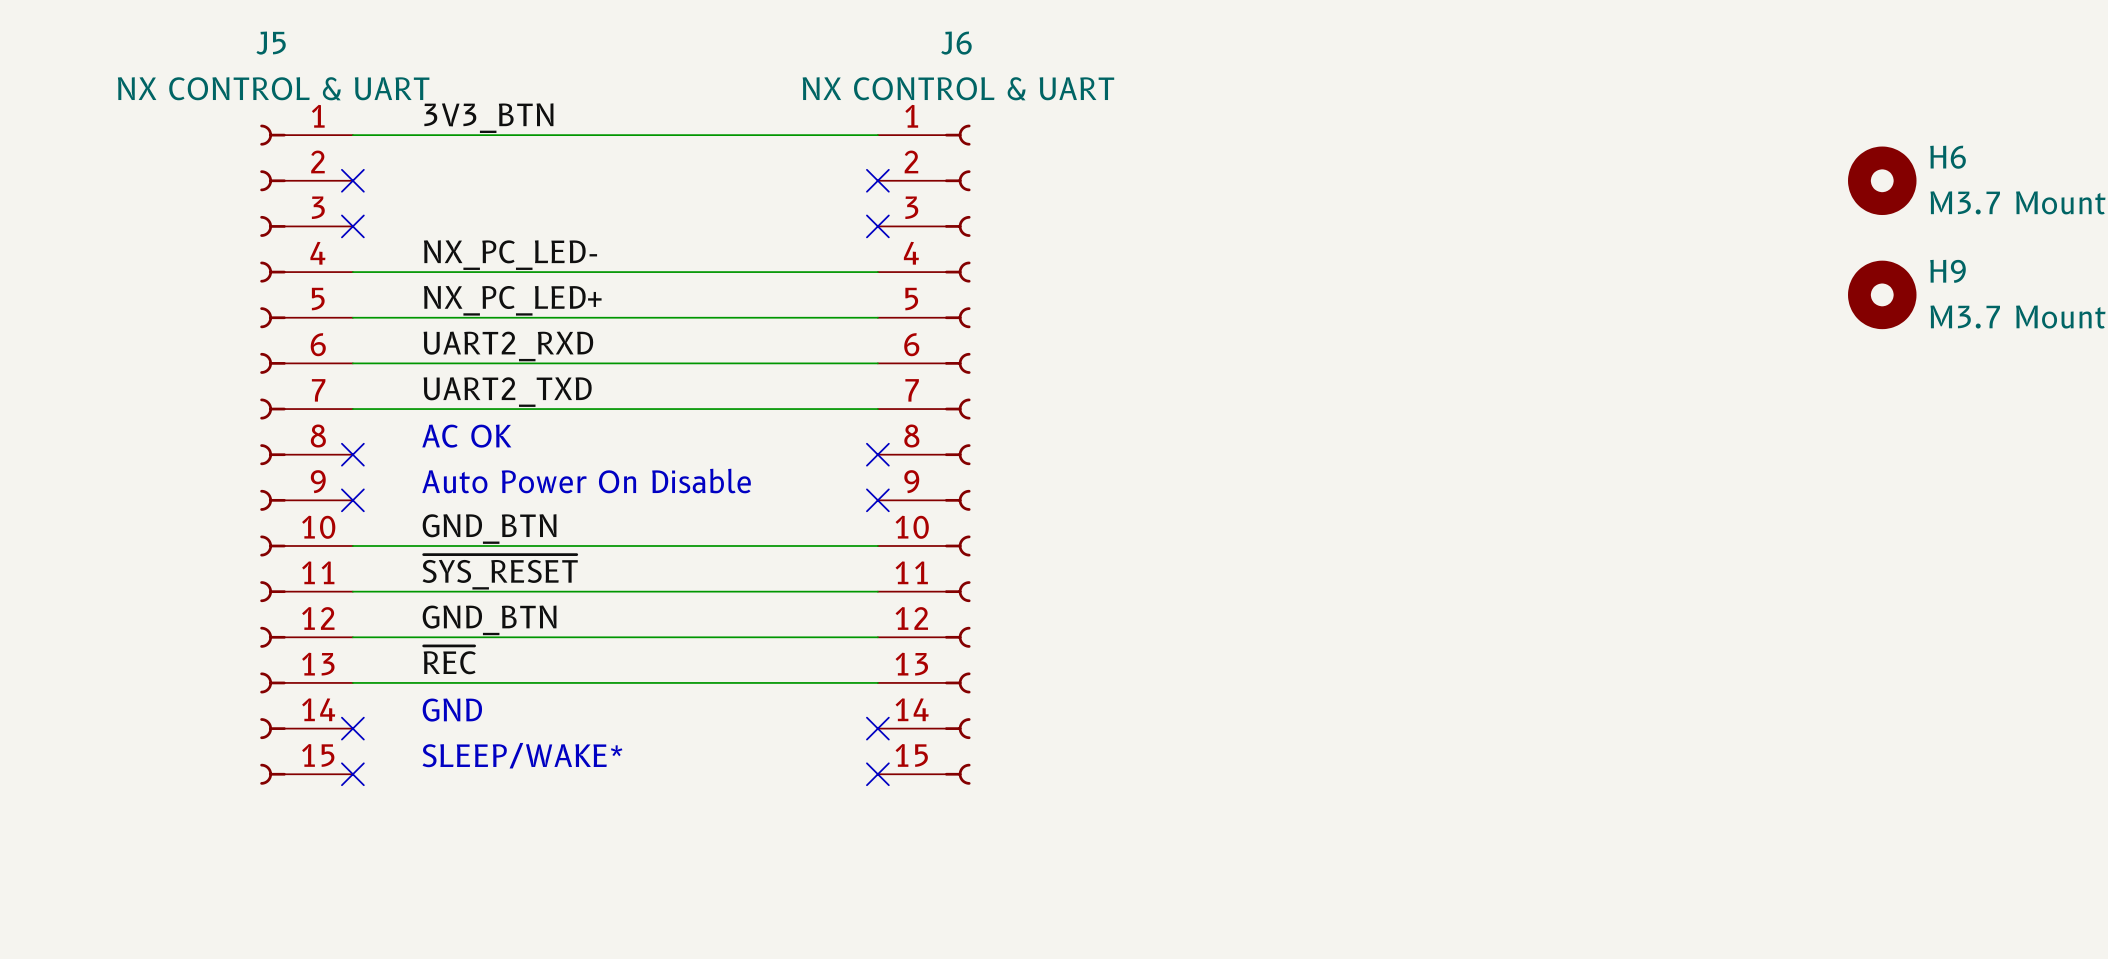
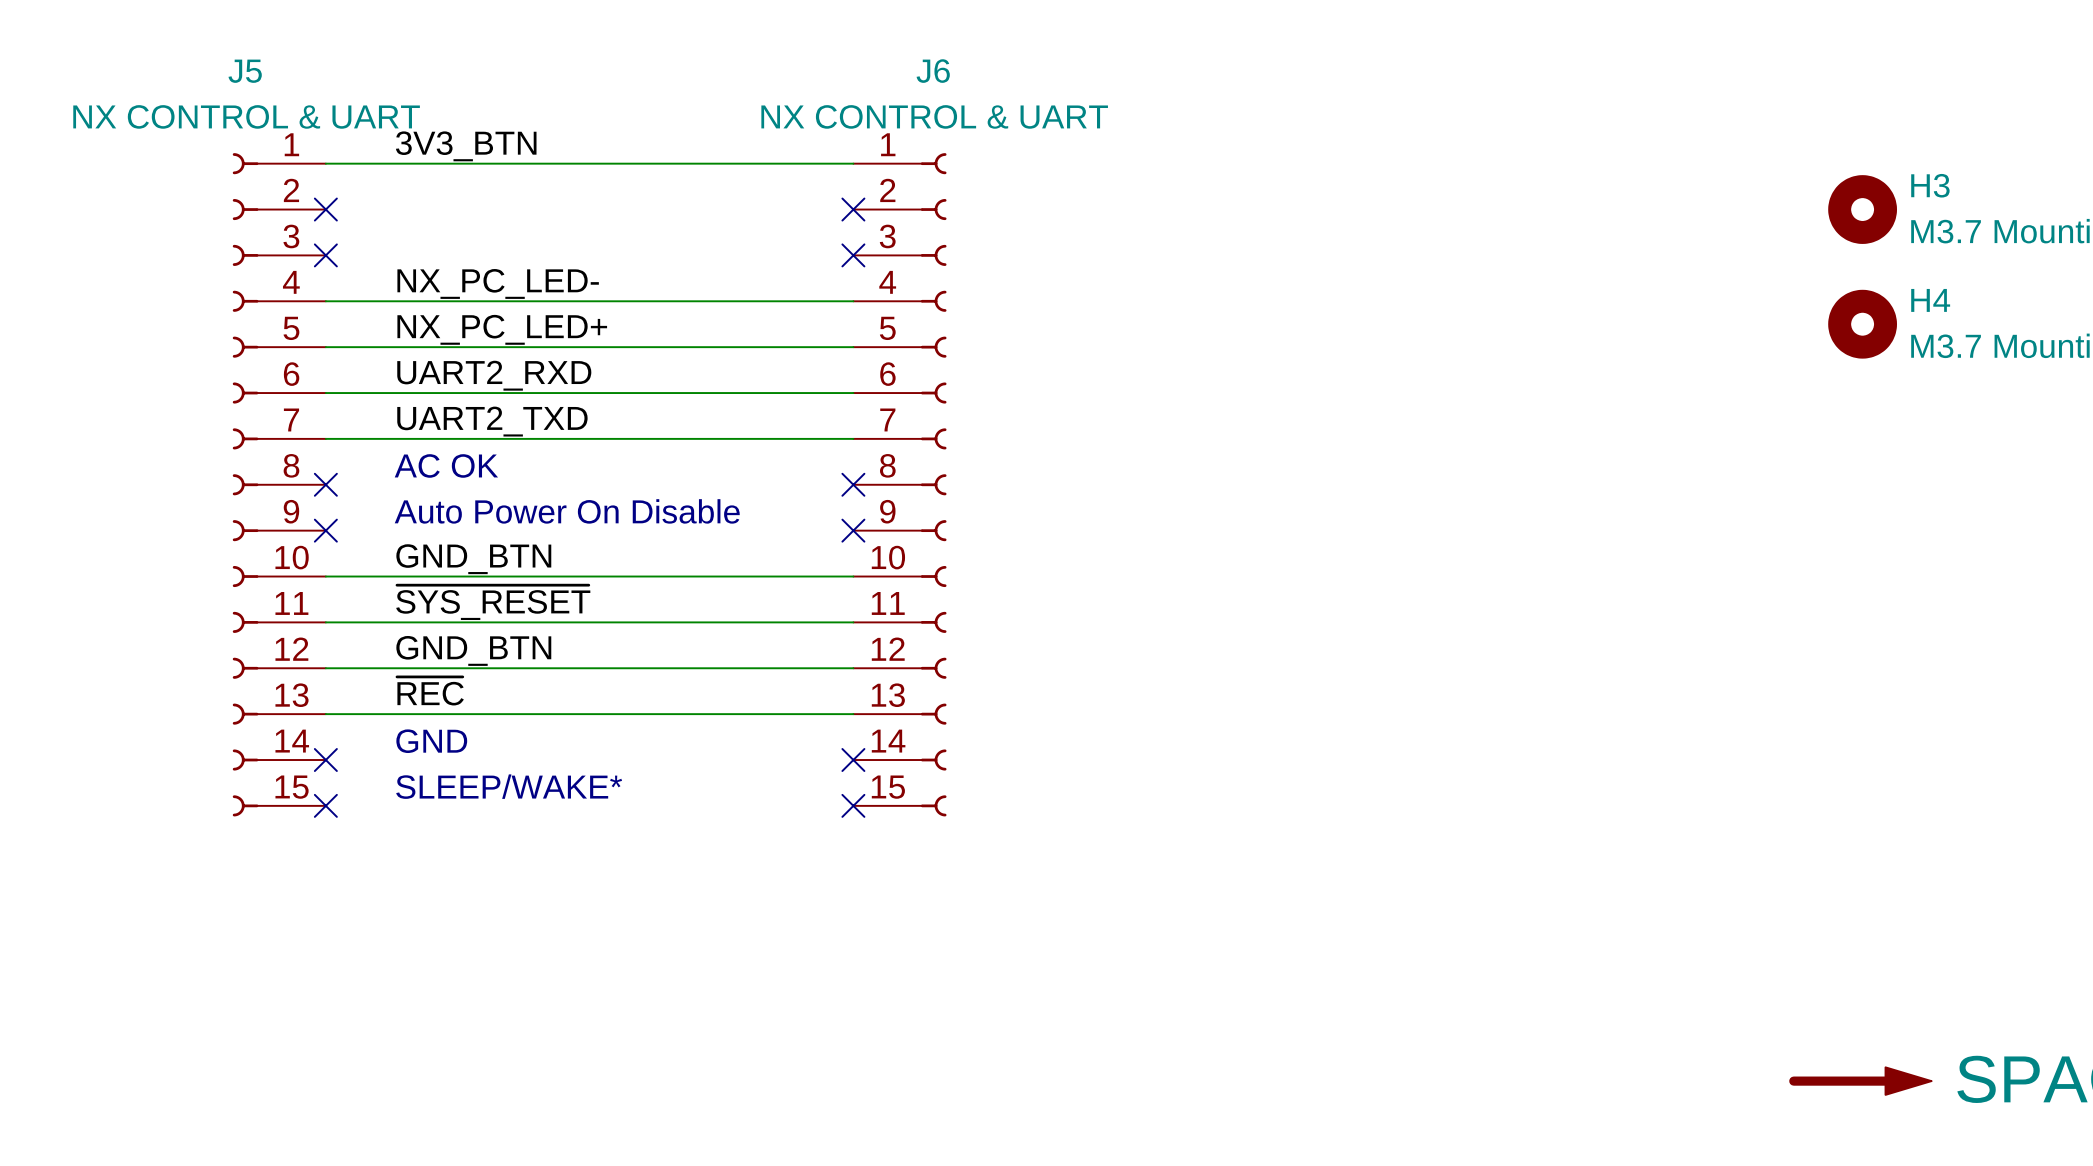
H6 name: H6 (1948, 157) -> H3 (1930, 185)
H9 name: H9 (1947, 271) -> H4 (1930, 300)

